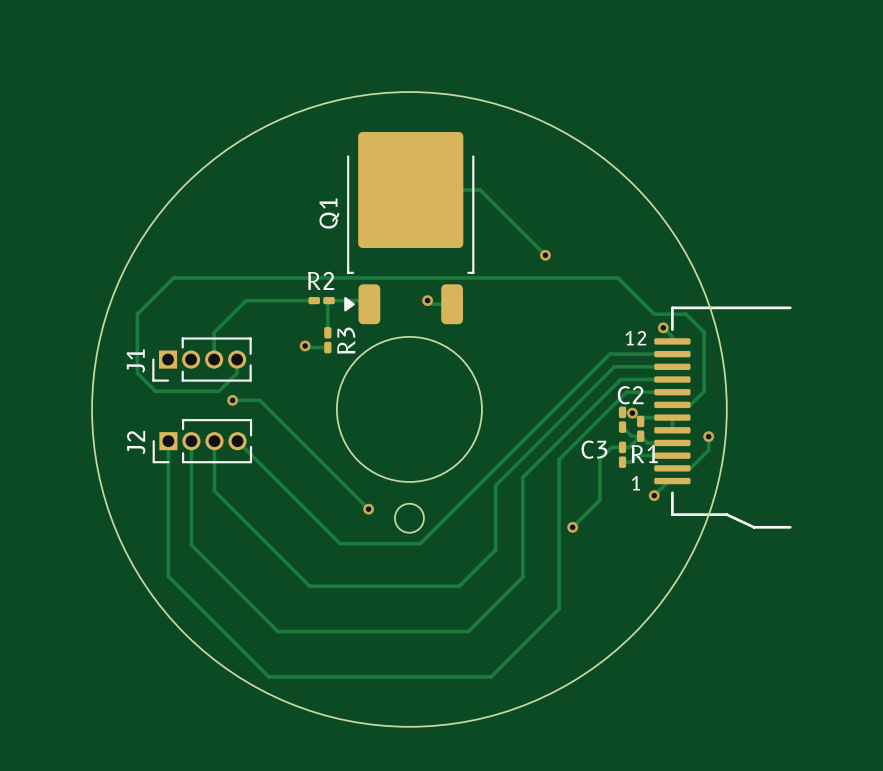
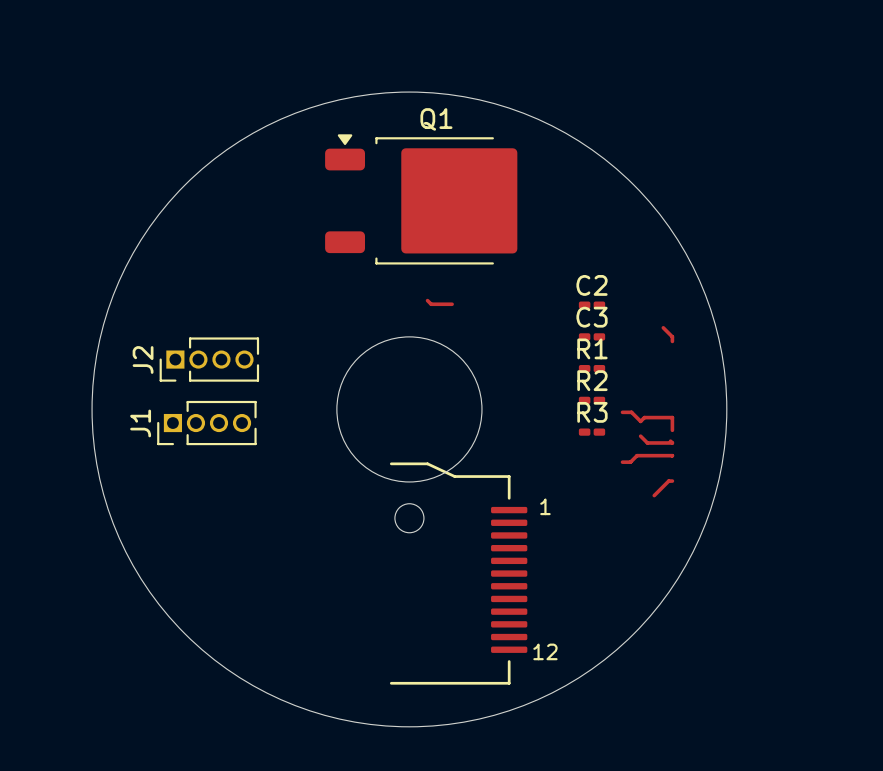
track: (410, 189) (480, 189) (545, 255) -> none
Q1 rotation: 0° (409, 228) -> 90° clockwise (421, 199)
via: (545, 255) -> none
track: (314, 300) (246, 300) (214, 332) (214, 359) -> none
R2 position: (321, 300) -> (592, 400)
via: (427, 300) -> none
track: (369, 304) (365, 300) (329, 300) (327, 332) -> none
via: (663, 327) -> none
R3 rotation: 0° (327, 340) -> 90° clockwise (592, 432)
R3 position: (327, 340) -> (592, 432)
track: (305, 345) (306, 347) (327, 347) -> none
via: (305, 345) -> none
track: (672, 354) (609, 354) (420, 543) (339, 543) (237, 441) -> none
J1 position: (202, 359) -> (206, 423)
track: (237, 359) (237, 373) (219, 391) (155, 391) (137, 373) (137, 314) (173, 277) (617, 277) (654, 314) (686, 314) (704, 332) (704, 391) (690, 404) (672, 404) -> none
track: (672, 366) (614, 366) (495, 485) (495, 549) (459, 586) (309, 586) (214, 491) (214, 441) -> none
track: (672, 379) (620, 379) (522, 477) (522, 577) (468, 631) (277, 631) (191, 545) (191, 441) -> none
track: (672, 392) (626, 392) (559, 459) (559, 608) (491, 676) (268, 676) (168, 576) (168, 441) -> none
track: (232, 400) (259, 400) (368, 509) -> none
via: (232, 400) -> none
via: (632, 413) -> none
part rotation: 0° (722, 417) -> 180° (458, 573)
part position: (722, 417) -> (458, 573)
C2 rotation: 0° (622, 419) -> 90° clockwise (592, 305)
C2 position: (622, 419) -> (592, 305)
track: (622, 427) (631, 436) (640, 436) (629, 447) (611, 447) (599, 459) (599, 500) (572, 527) -> none
C3 rotation: 0° (640, 428) -> 90° clockwise (592, 336)
C3 position: (640, 428) -> (592, 336)
track: (708, 436) (708, 450) (690, 468) (672, 468) -> none
via: (708, 436) -> none
J2 position: (202, 441) -> (209, 359)
R1 rotation: 0° (622, 454) -> 90° clockwise (592, 368)
R1 position: (622, 454) -> (592, 368)
via: (654, 495) -> none
via: (368, 509) -> none
via: (572, 527) -> none

